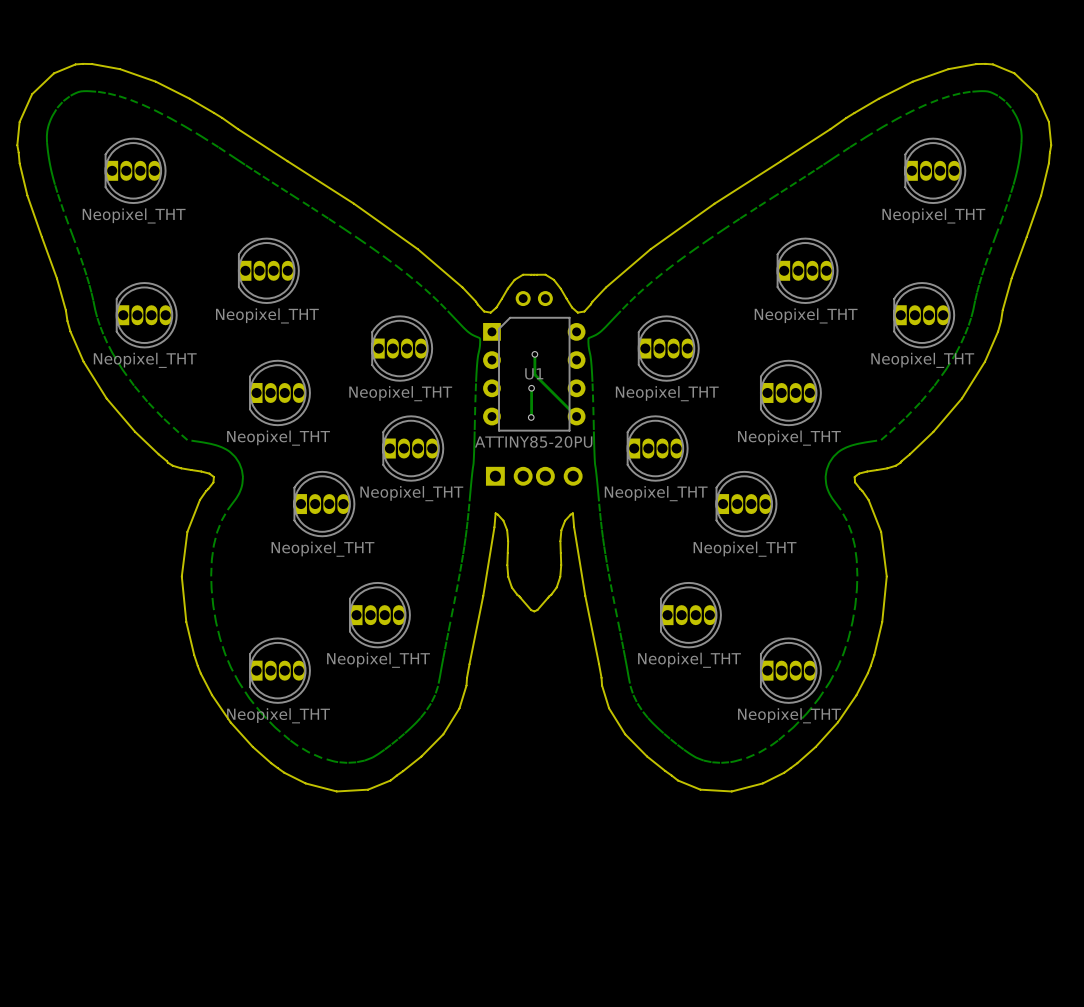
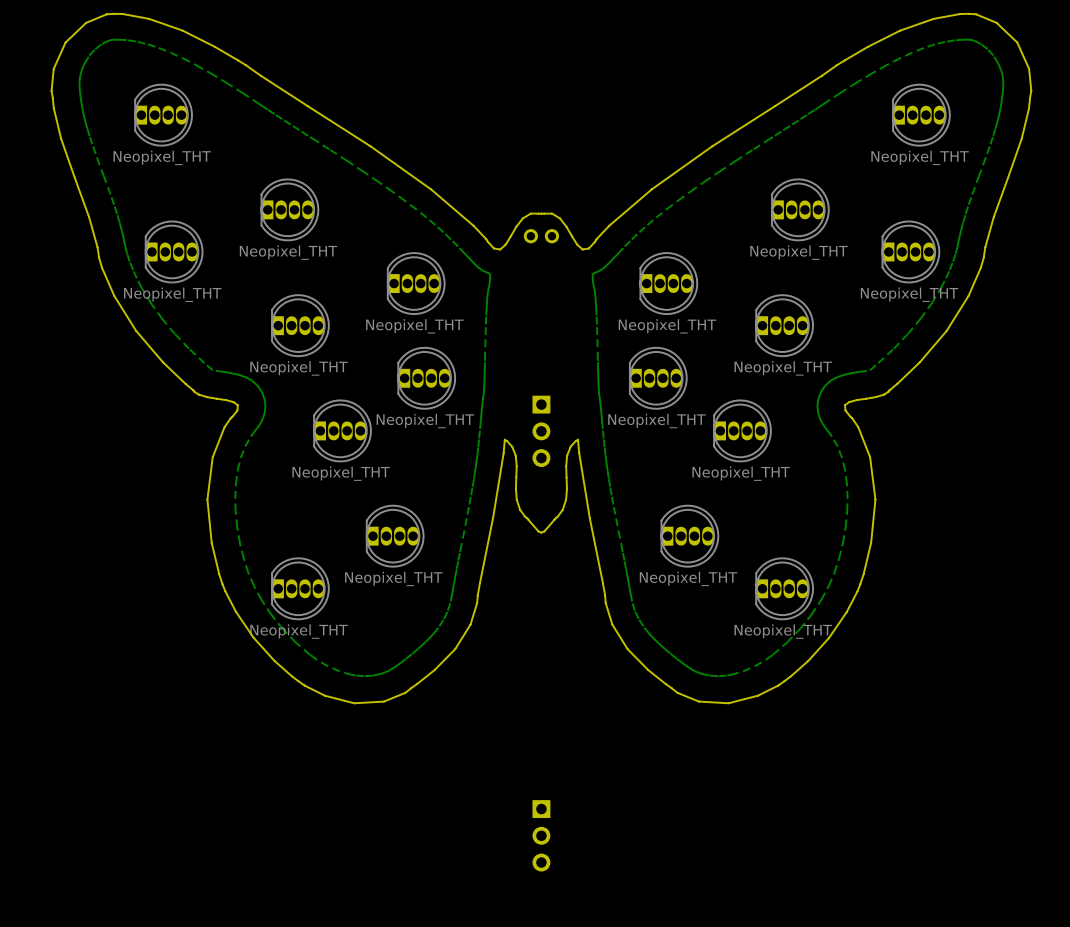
track: (534, 354) (534, 374) (576, 416) -> none
via: (534, 354) -> none
U1: ATTINY85-20PU (534, 374) -> none
track: (531, 388) (531, 417) -> none
via: (531, 388) -> none
via: (531, 417) -> none
part: (534, 476) -> none
part: none -> (541, 431)
part: none -> (541, 835)

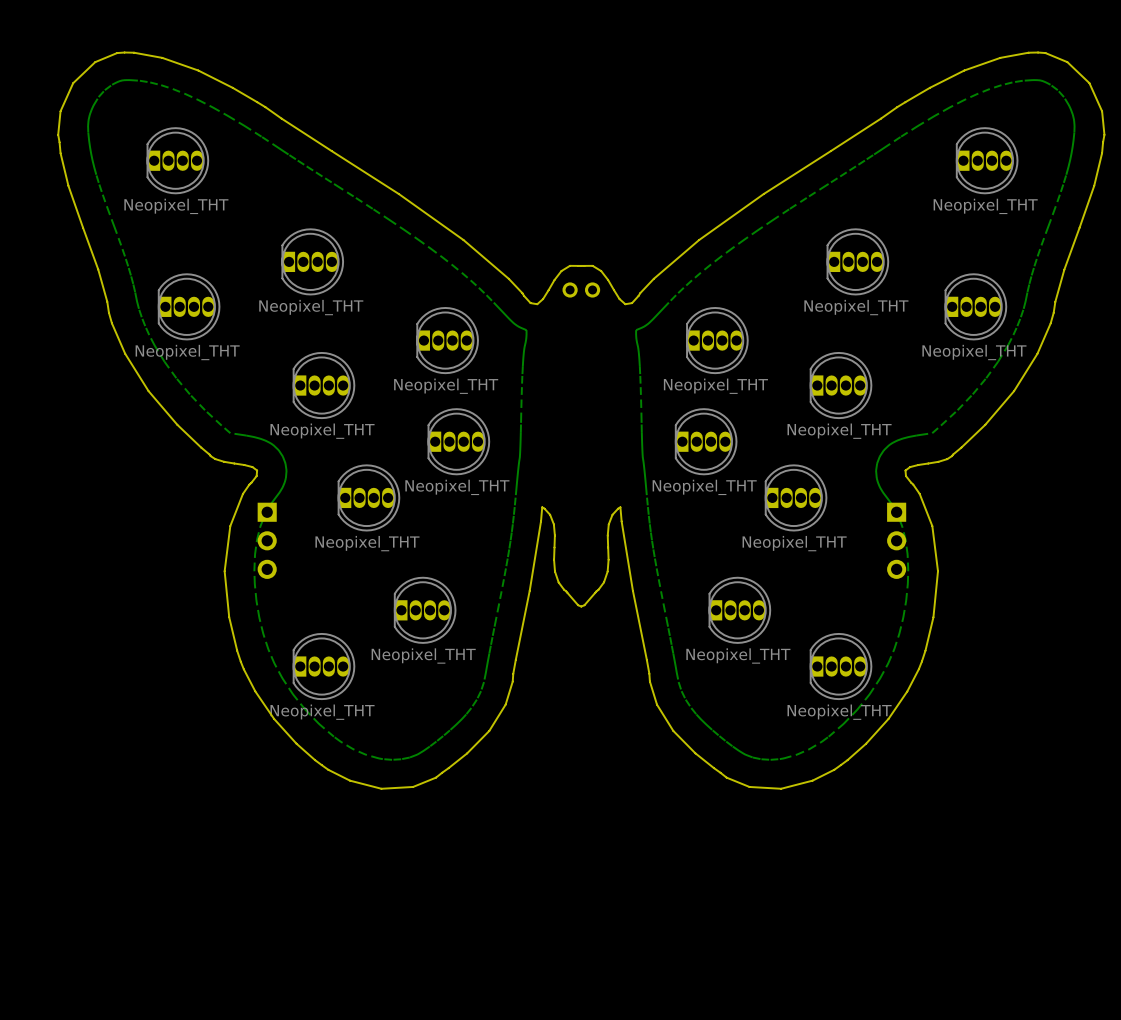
part: (541, 431) -> none
part: none -> (267, 540)
part: none -> (896, 540)
part: (541, 835) -> none

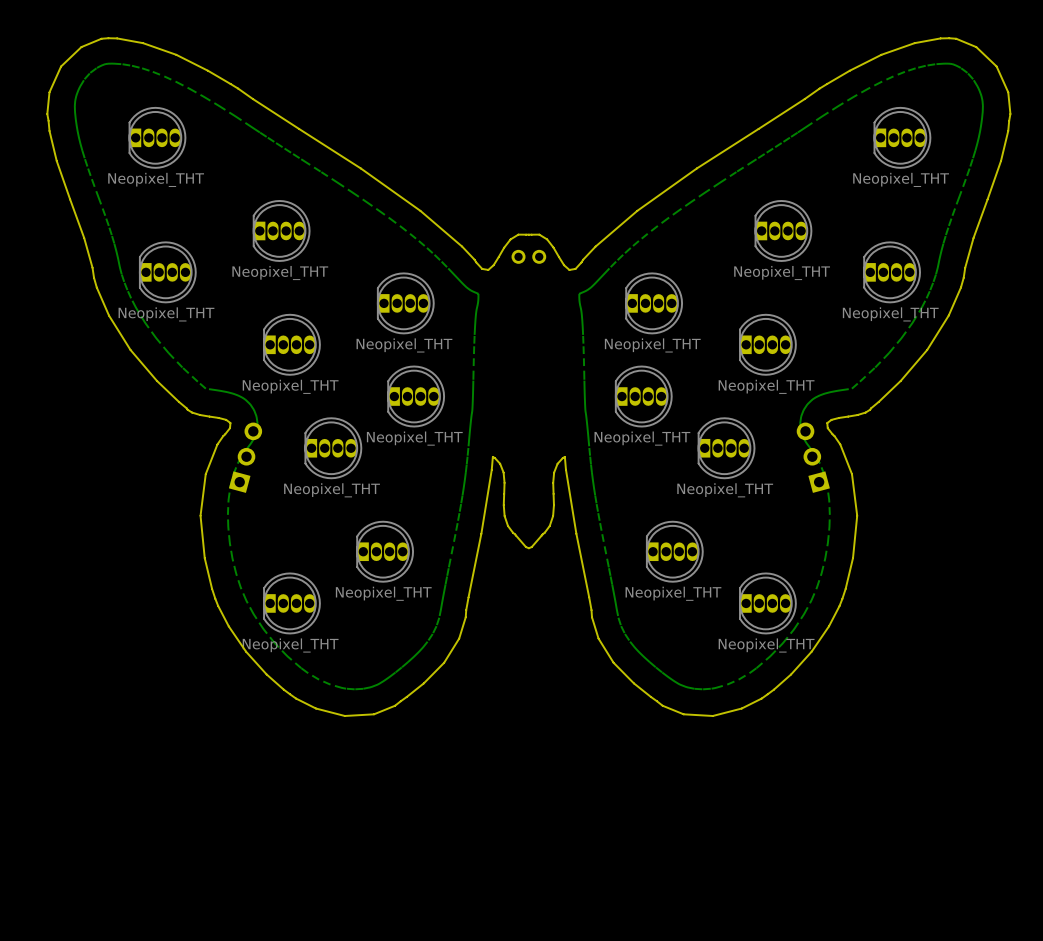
part: none -> (245, 457)
part: none -> (813, 457)
part: (267, 540) -> none
part: (896, 540) -> none

